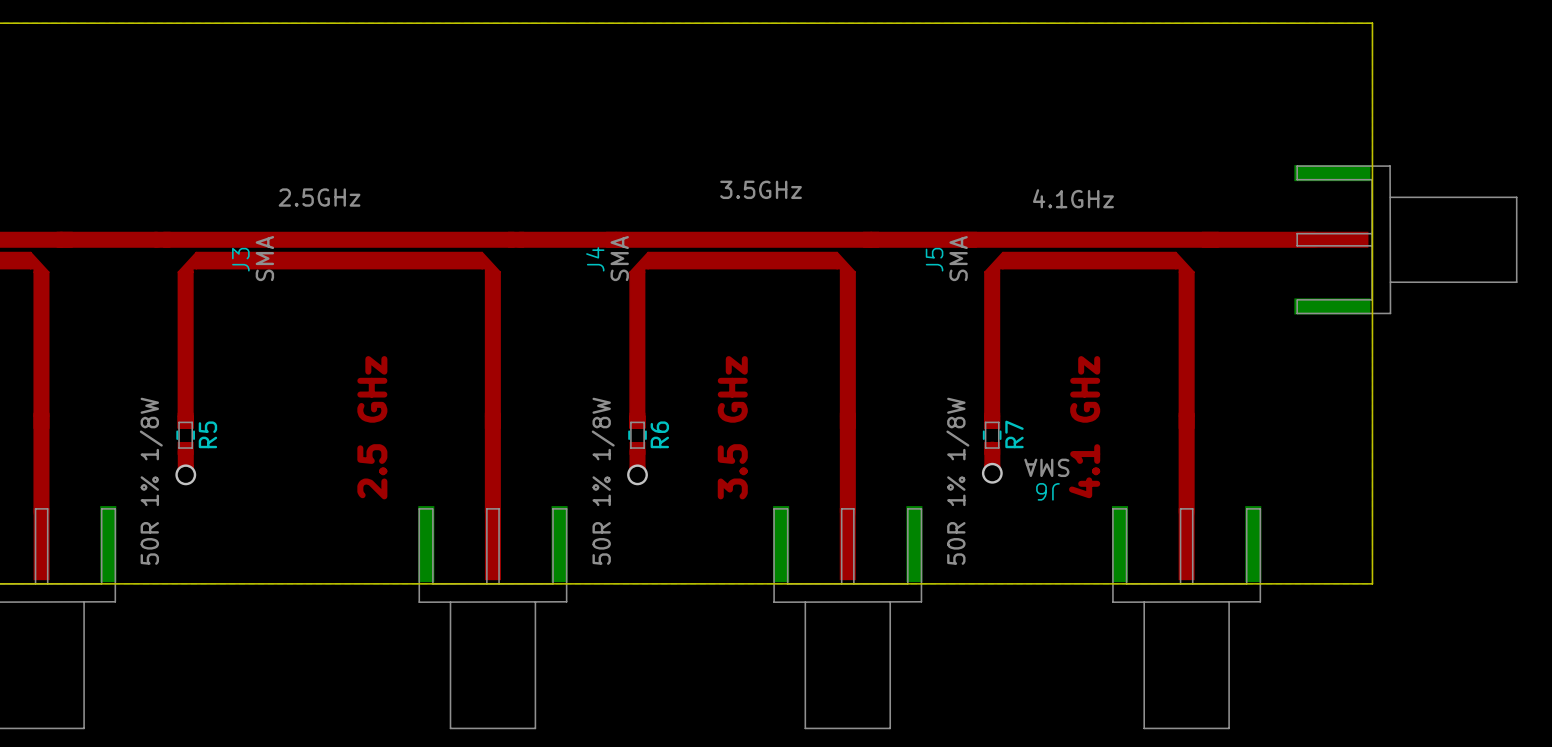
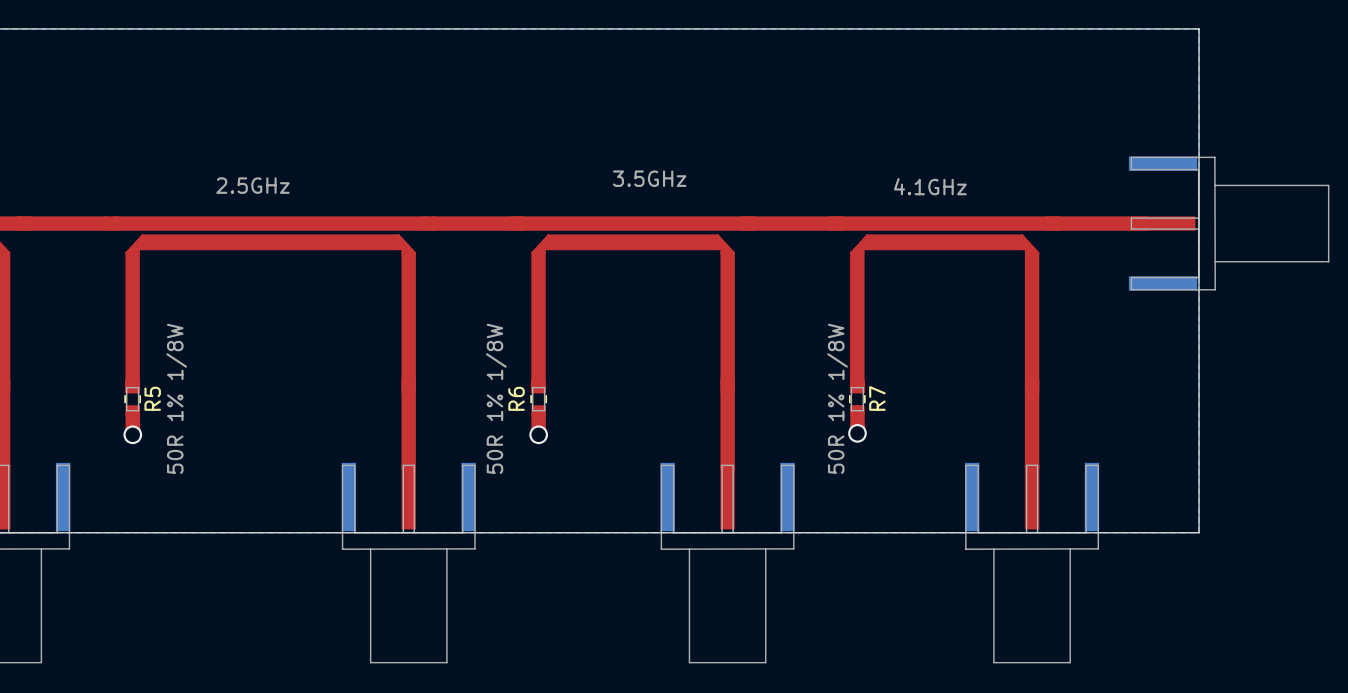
J3 value: SMA (264, 258) -> none
J4 value: SMA (619, 258) -> none
J5 value: SMA (958, 258) -> none
J3 name: J3 (240, 259) -> none
J4 name: J4 (595, 259) -> none
J5 name: J5 (934, 259) -> none
text: 2.5 GHz (372, 427) -> none
text: 3.5 GHz (732, 427) -> none
text: 4.1 GHz (1084, 427) -> none
R6 name position: R6 (659, 434) -> R6 (516, 398)
J6 value: SMA (1046, 467) -> none
R5 value position: 50R 1% 1/8W (151, 481) -> 50R 1% 1/8W (176, 398)
R6 value position: 50R 1% 1/8W (603, 481) -> 50R 1% 1/8W (496, 398)
R7 value position: 50R 1% 1/8W (957, 481) -> 50R 1% 1/8W (837, 398)
J6 name: J6 (1047, 491) -> none

